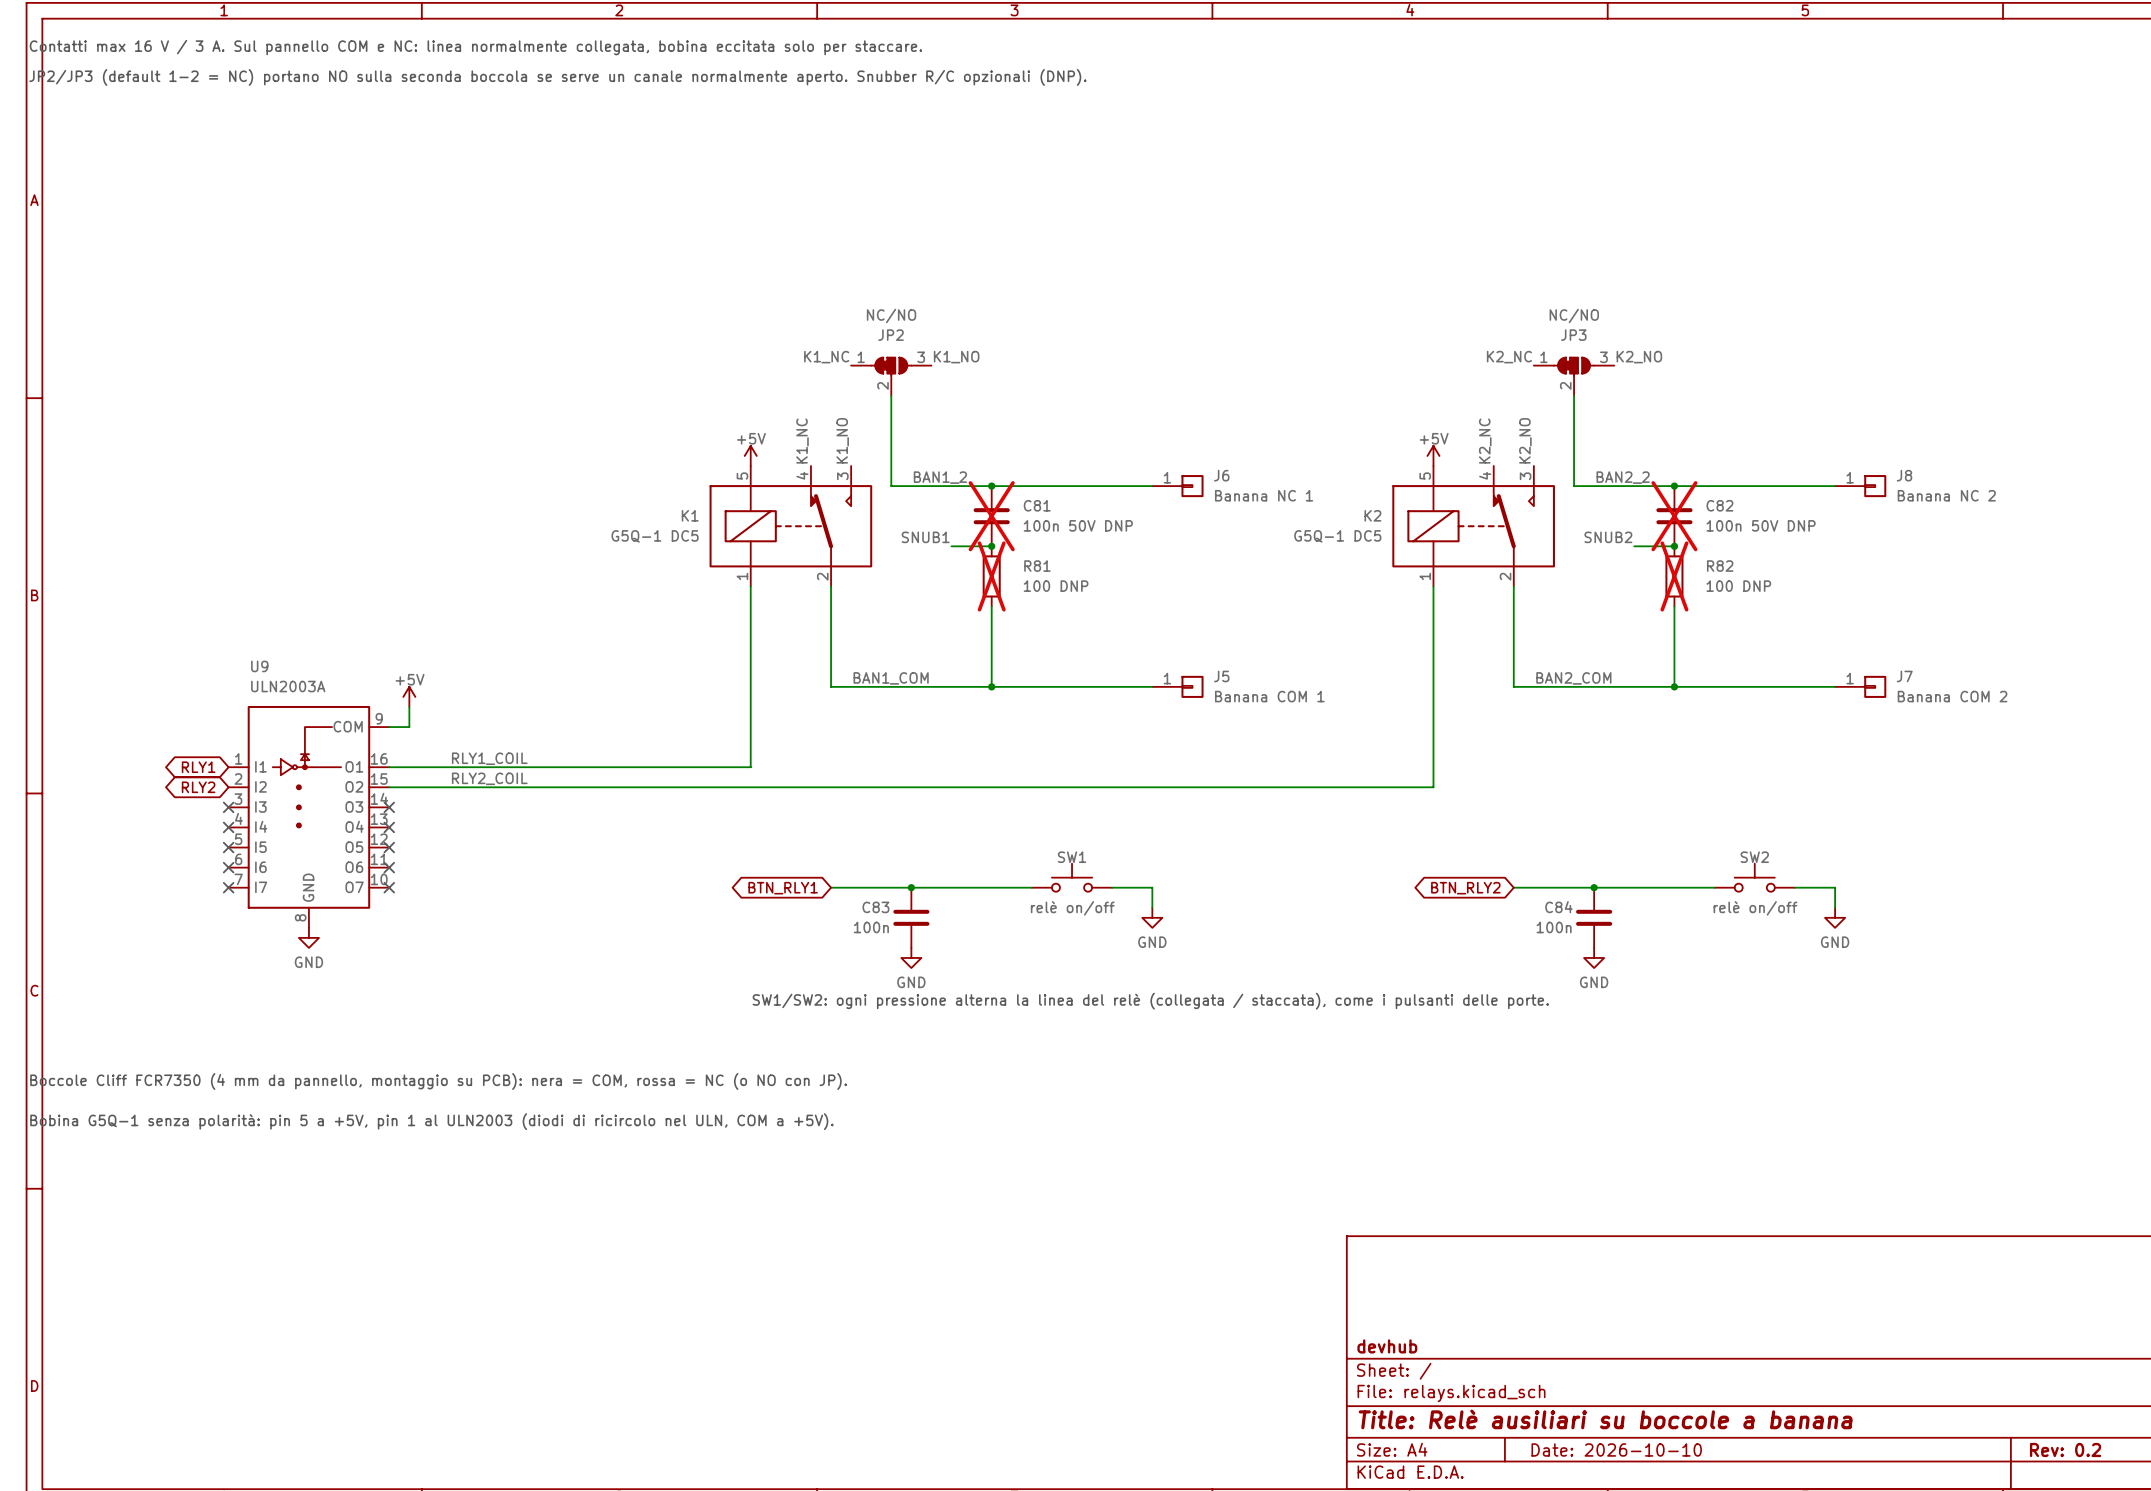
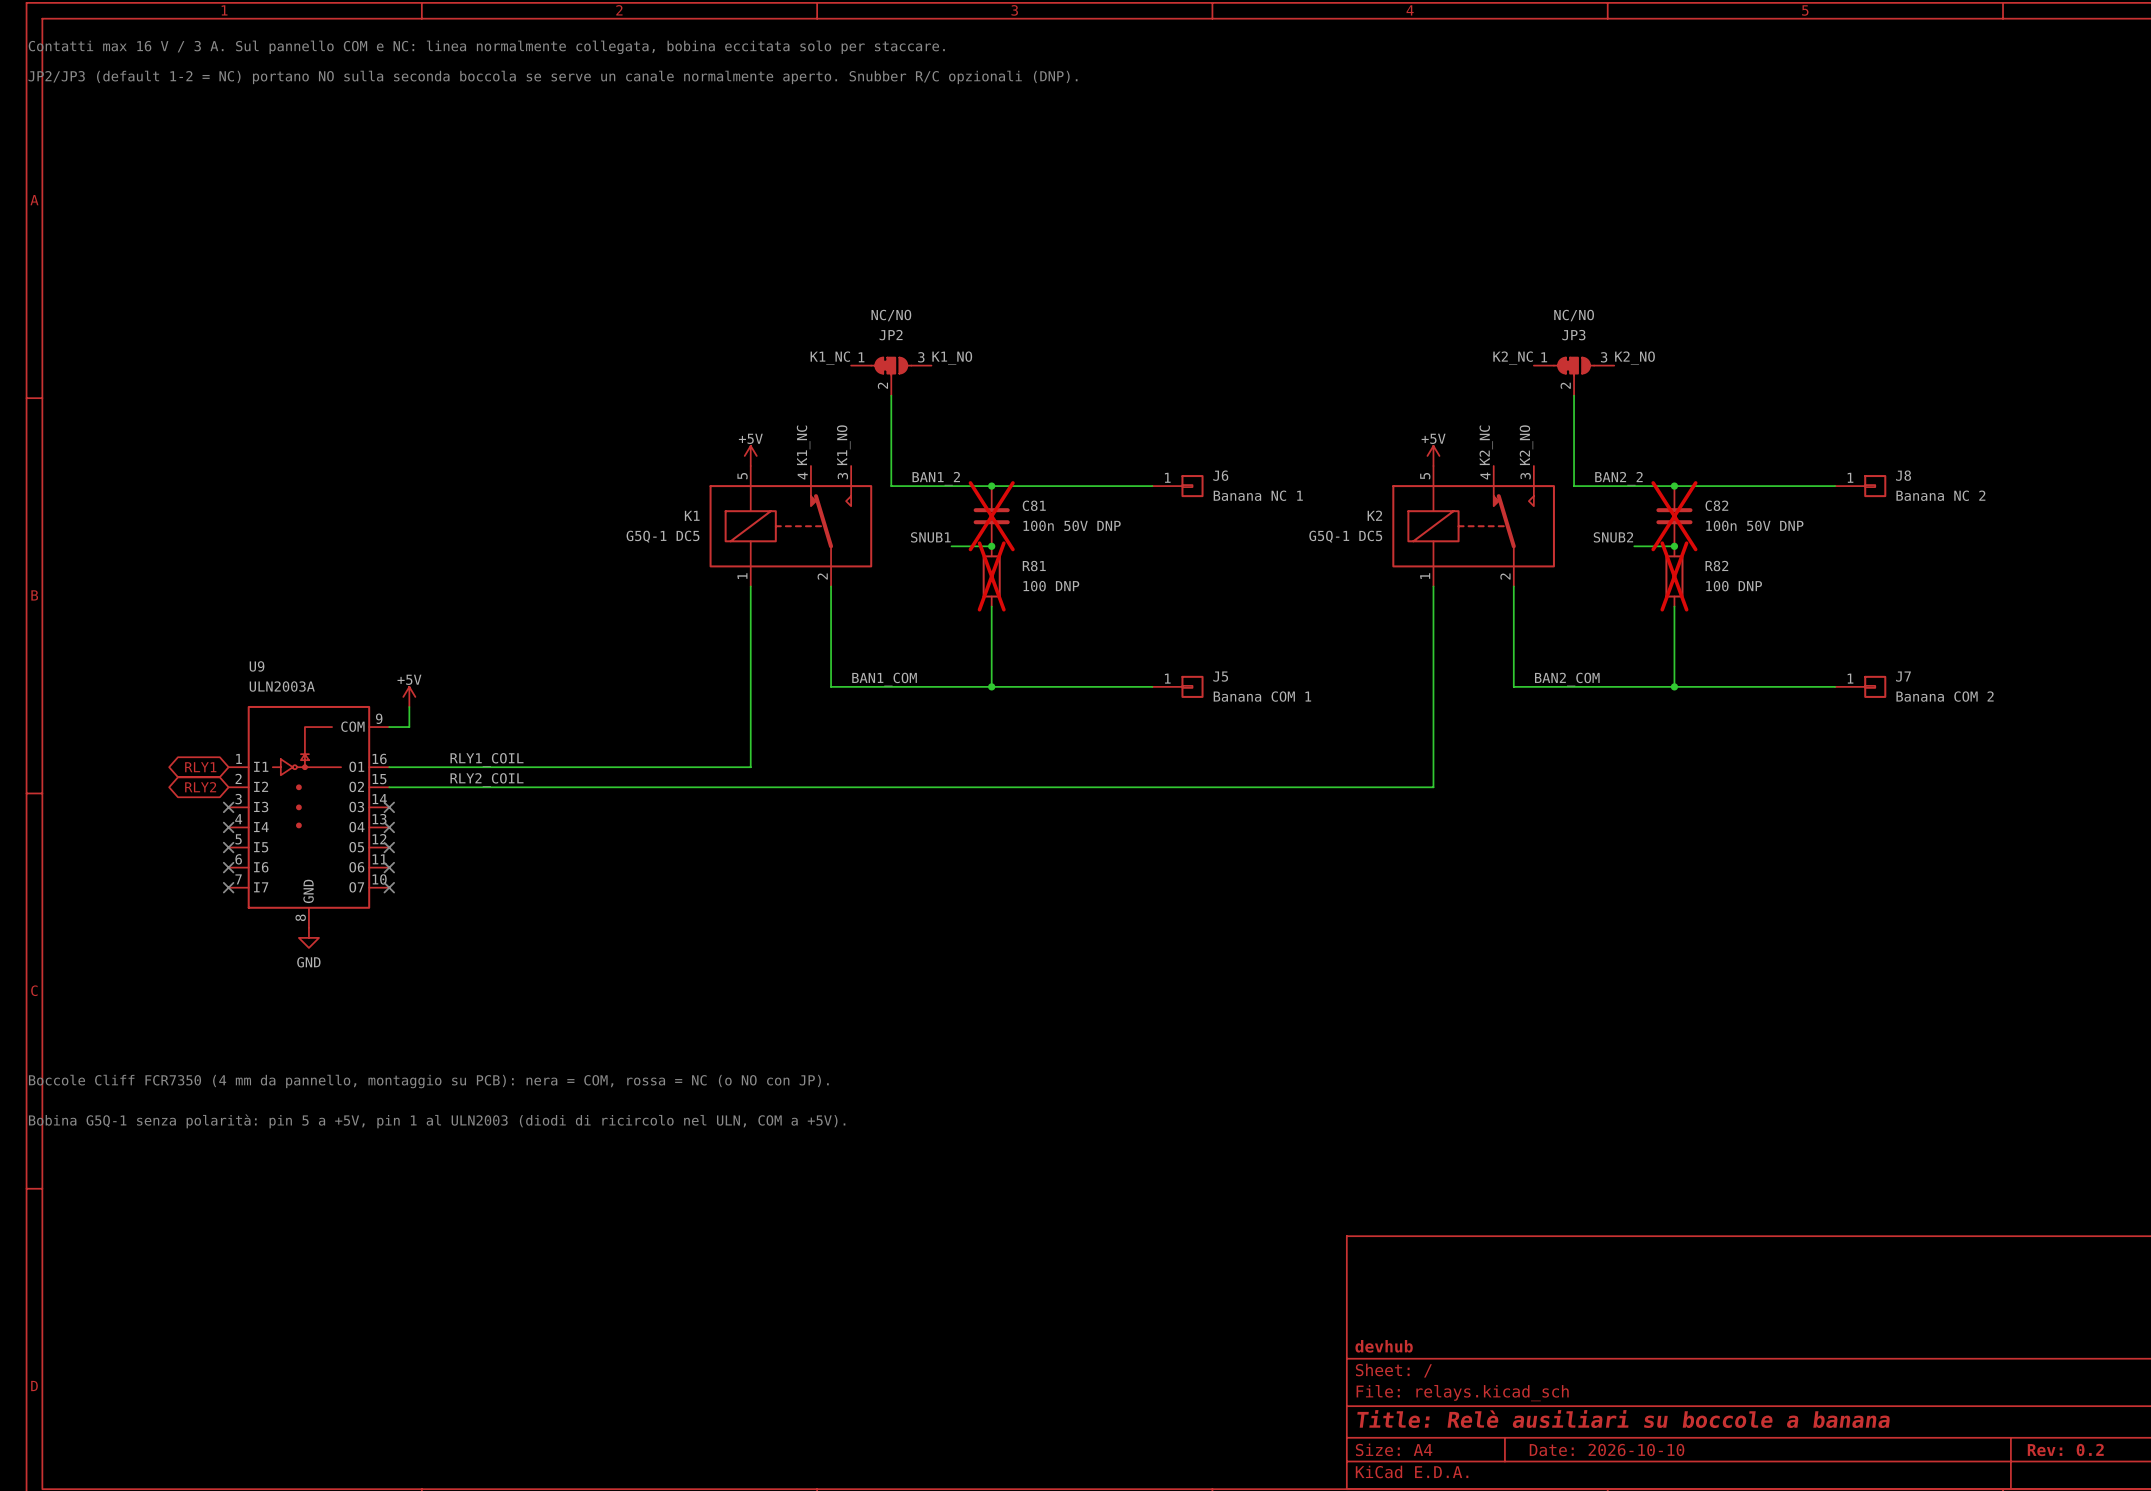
SW1: relè on/off (1072, 877) -> none
SW2: relè on/off (1754, 877) -> none
wire: (831, 887) (1031, 887) -> none
junction: (911, 887) -> none
wire: (1112, 887) (1152, 887) (1152, 907) -> none
wire: (1513, 887) (1714, 887) -> none
junction: (1594, 887) -> none
wire: (1794, 887) (1835, 887) (1835, 907) -> none
global label: BTN_RLY1 (783, 888) -> none
global label: BTN_RLY2 (1465, 888) -> none
C83: 100n (911, 917) -> none
power symbol: GND (1152, 917) -> none
C84: 100n (1594, 917) -> none
power symbol: GND (1835, 917) -> none
power symbol: GND (911, 957) -> none
power symbol: GND (1594, 957) -> none
text: SW1/SW2: ogni pressione alterna la linea del relè (collegata / staccata), come i pulsanti delle porte. (1150, 1001) -> none

